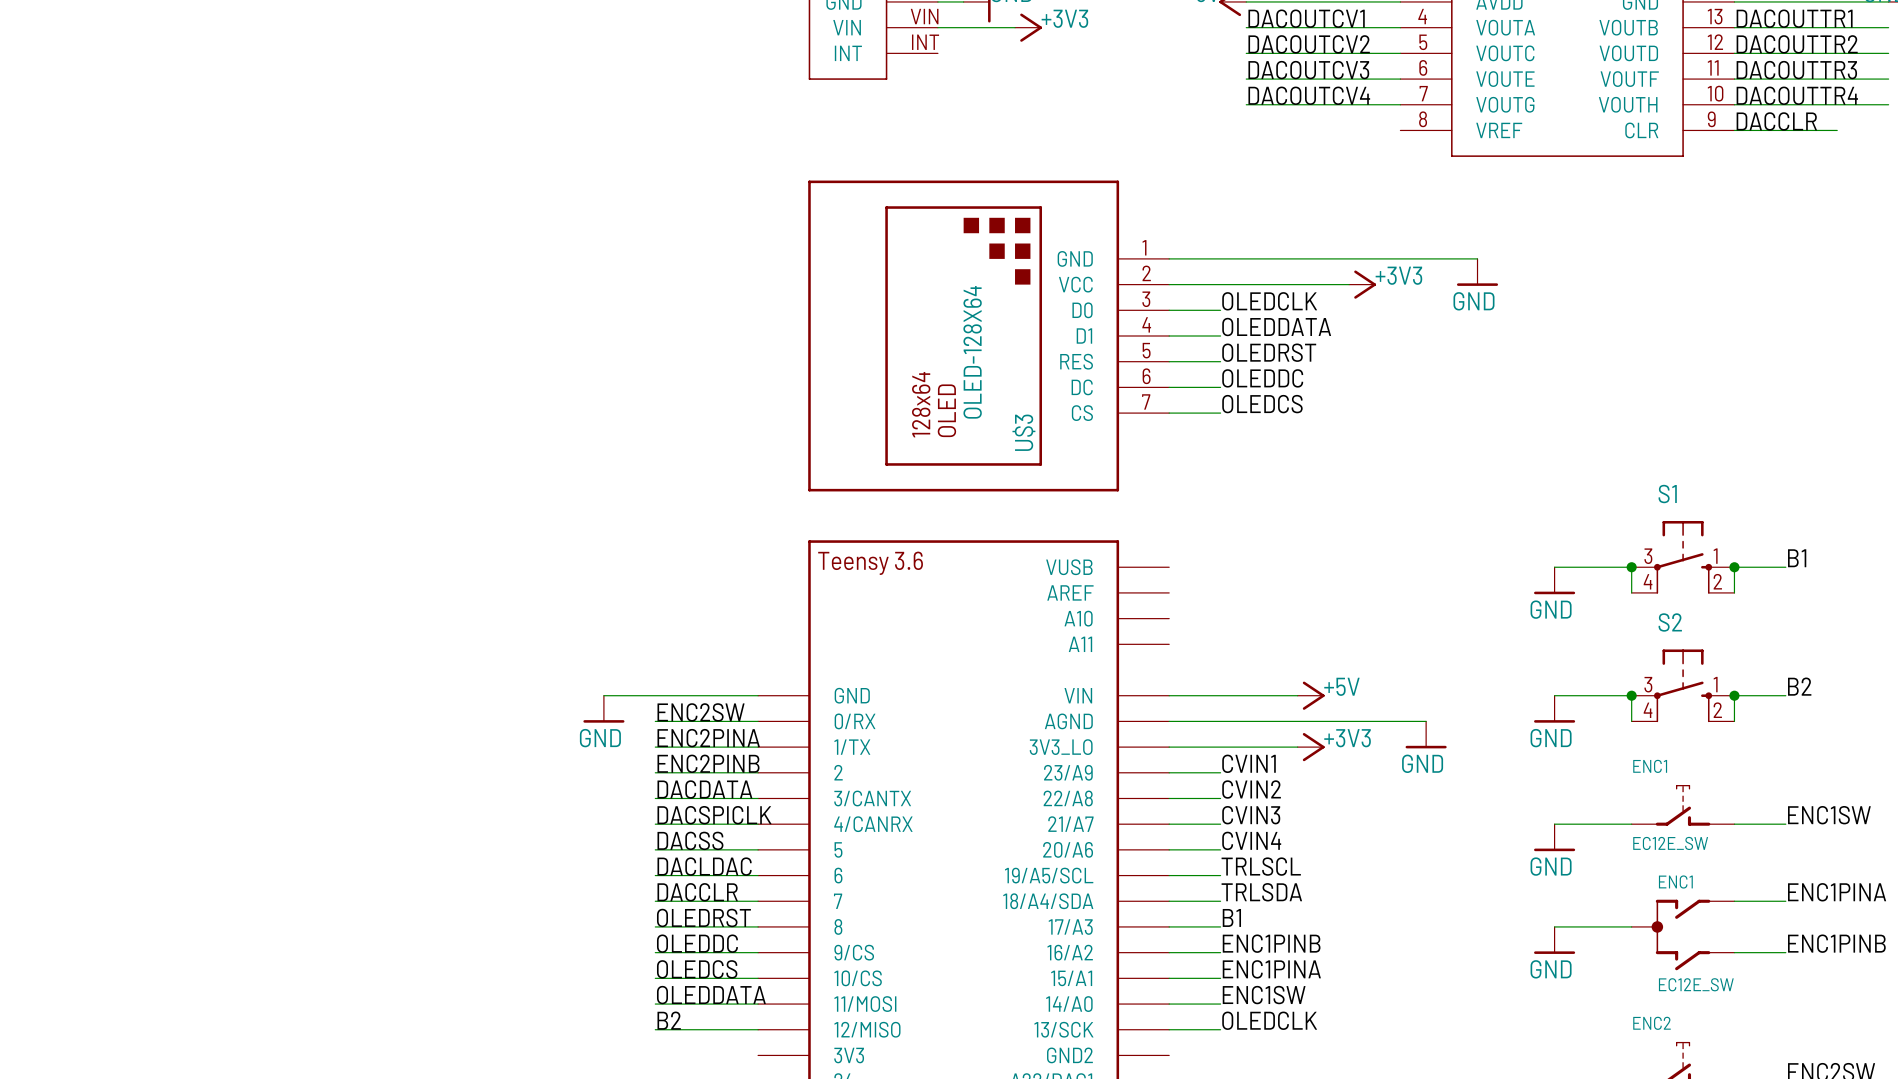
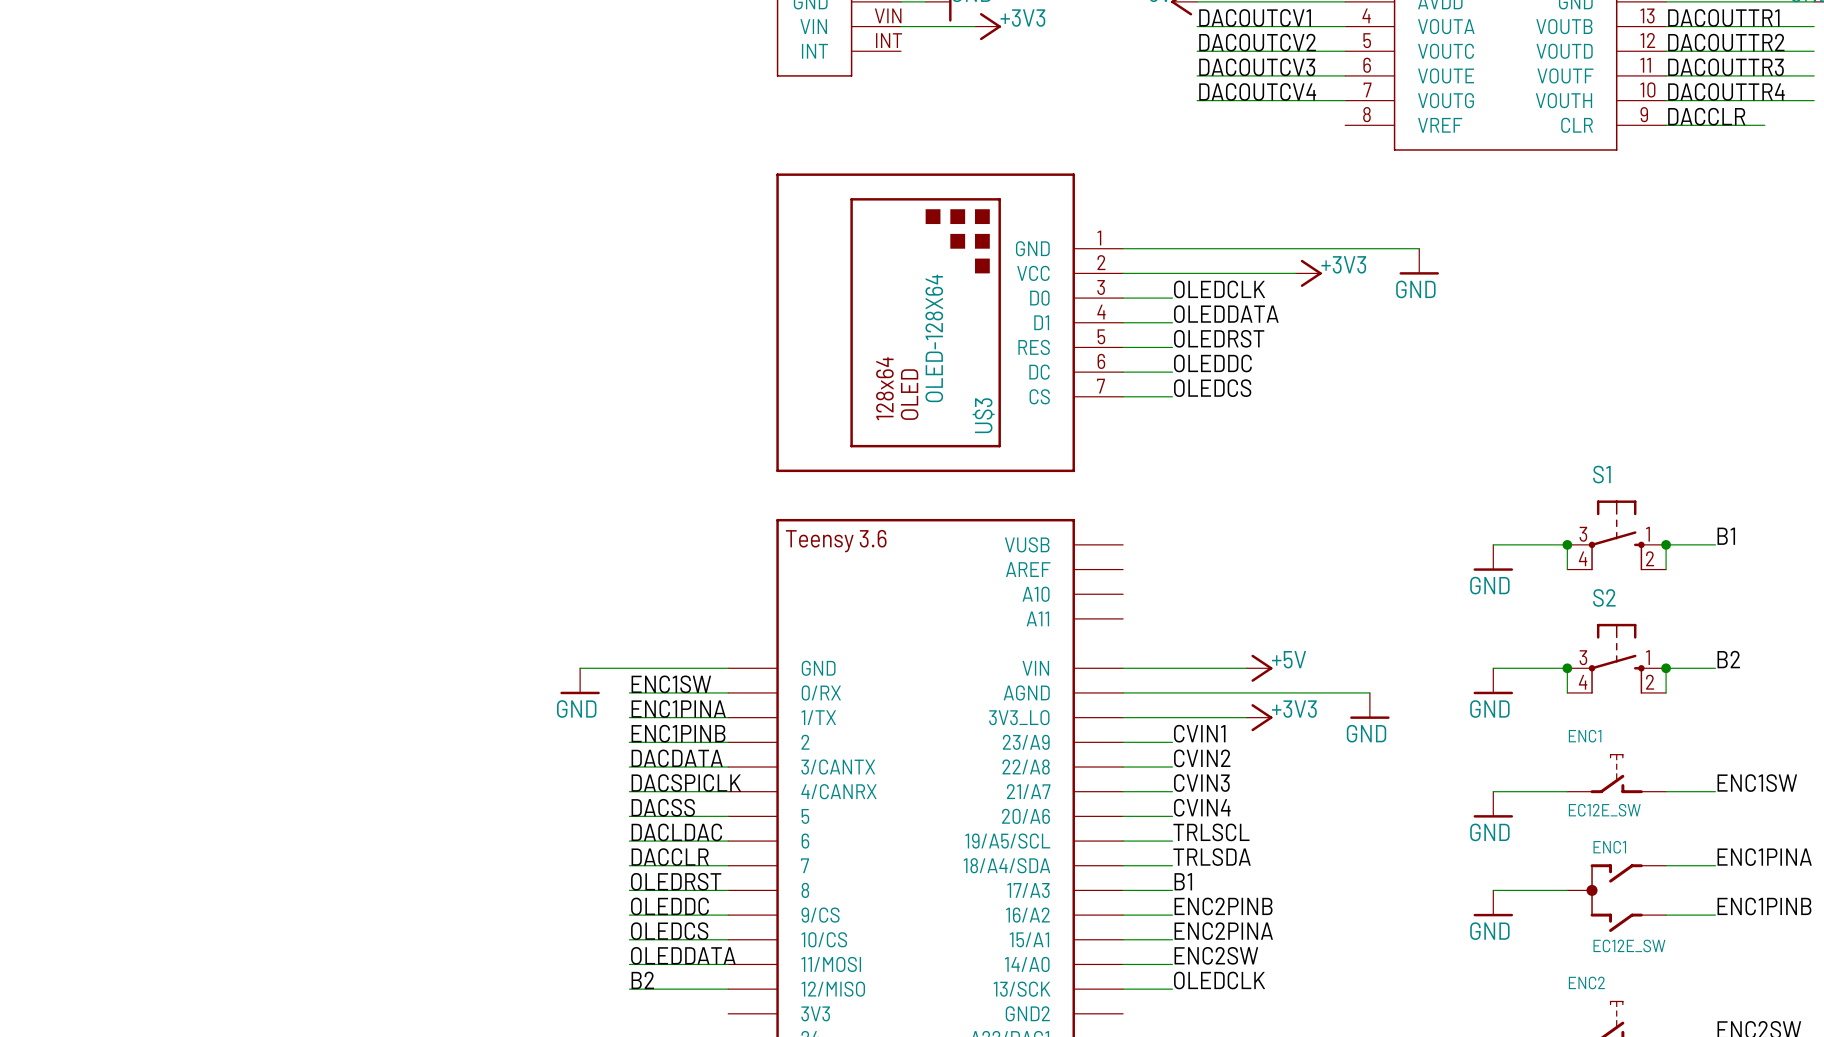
label: ENC2SW (701, 712) -> ENC1SW (671, 684)
label: ENC2PINA (708, 738) -> ENC1PINA (678, 709)
label: ENC2PINB (708, 763) -> ENC1PINB (678, 733)
label: ENC1PINB (1271, 943) -> ENC2PINB (1223, 906)
label: ENC1PINA (1271, 969) -> ENC2PINA (1223, 931)
label: ENC1SW (1264, 995) -> ENC2SW (1216, 955)

